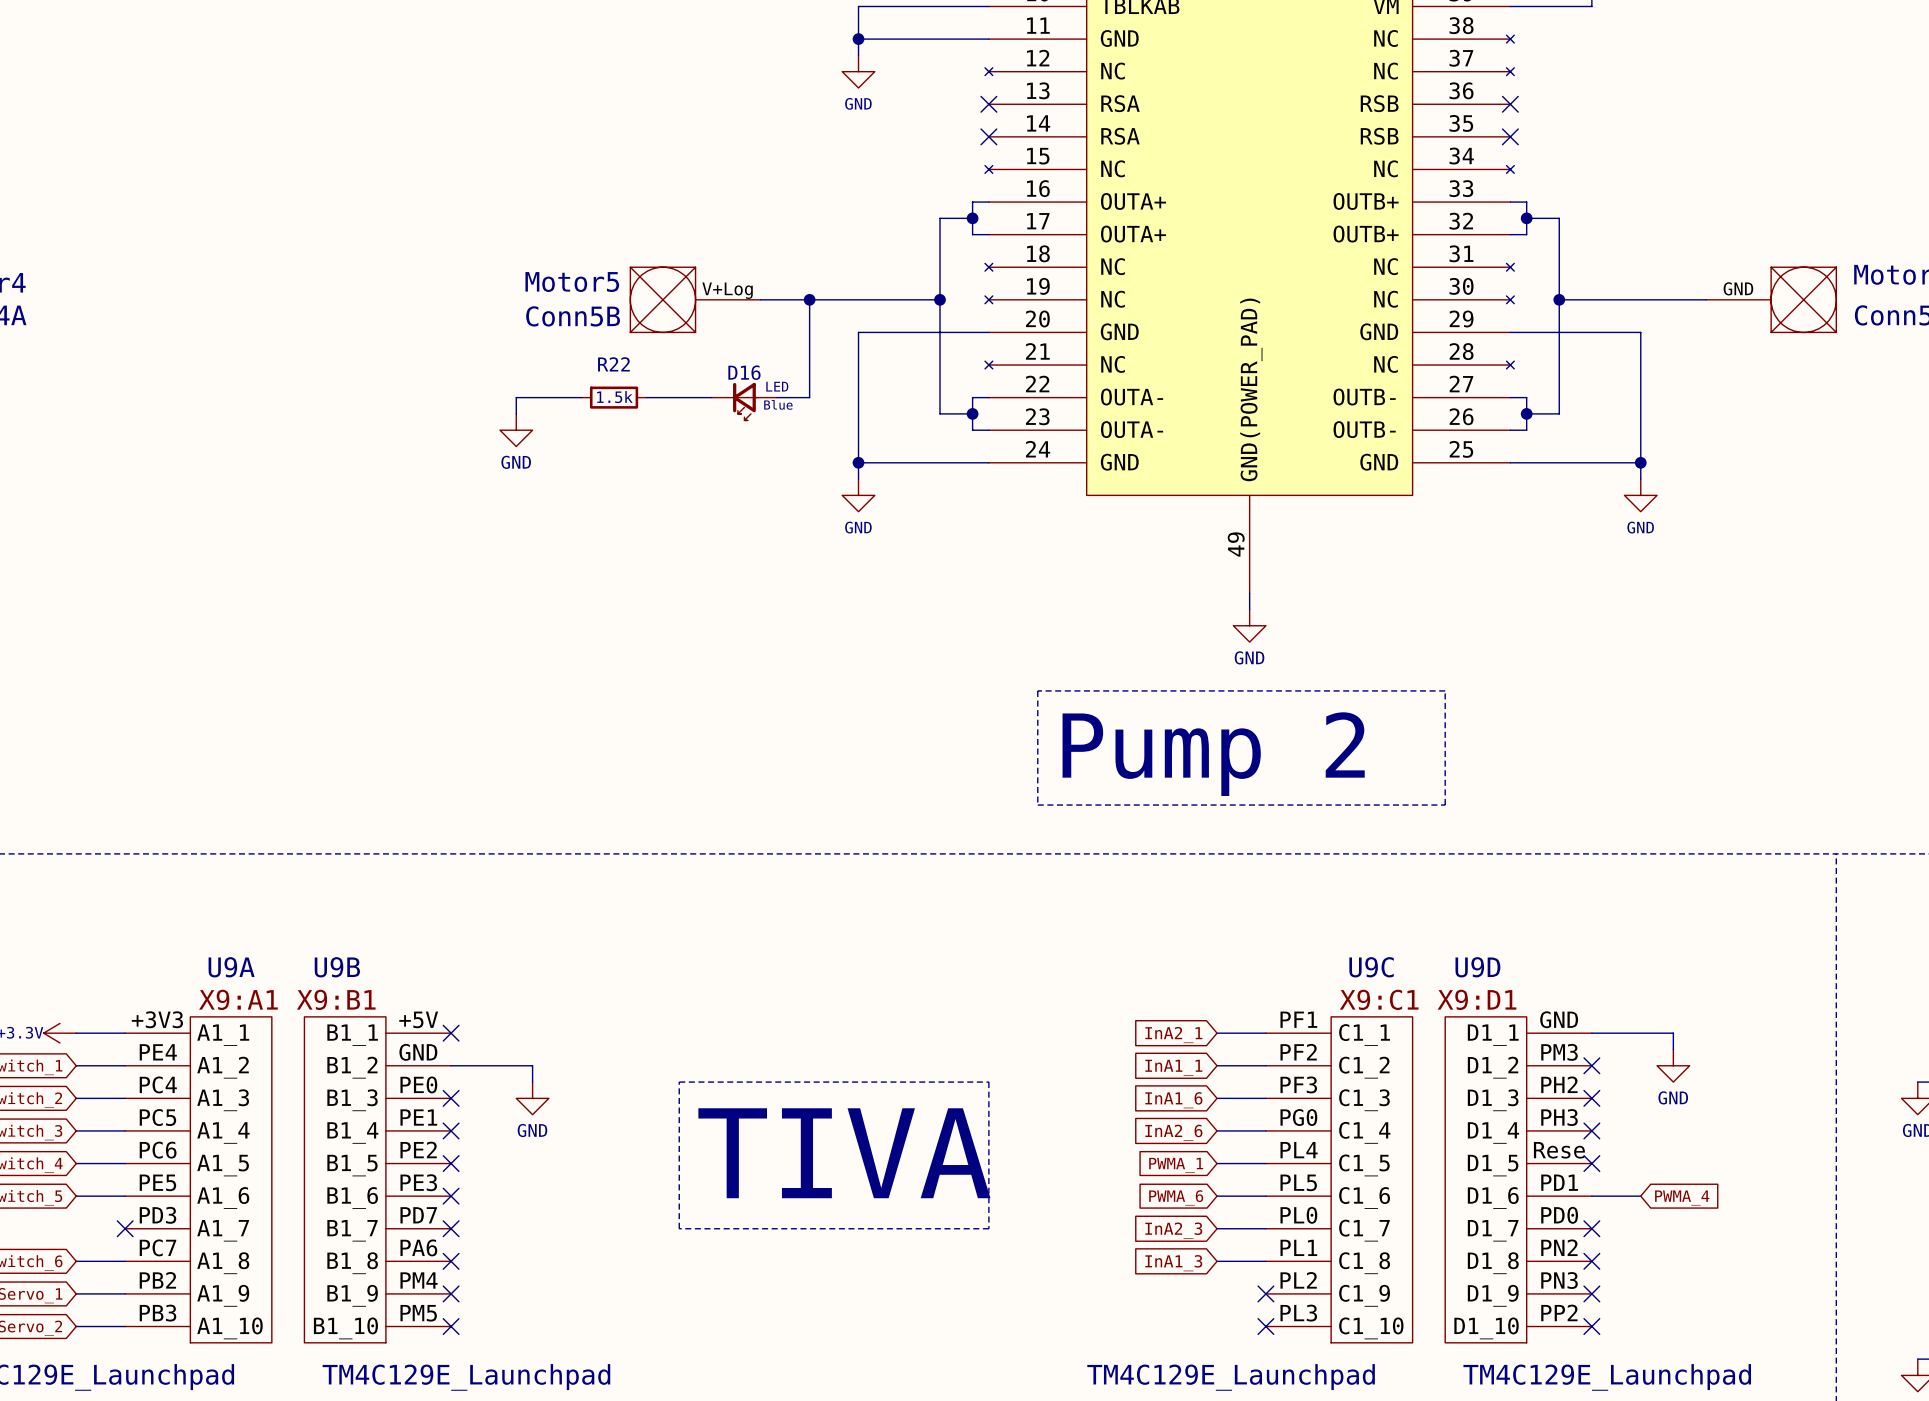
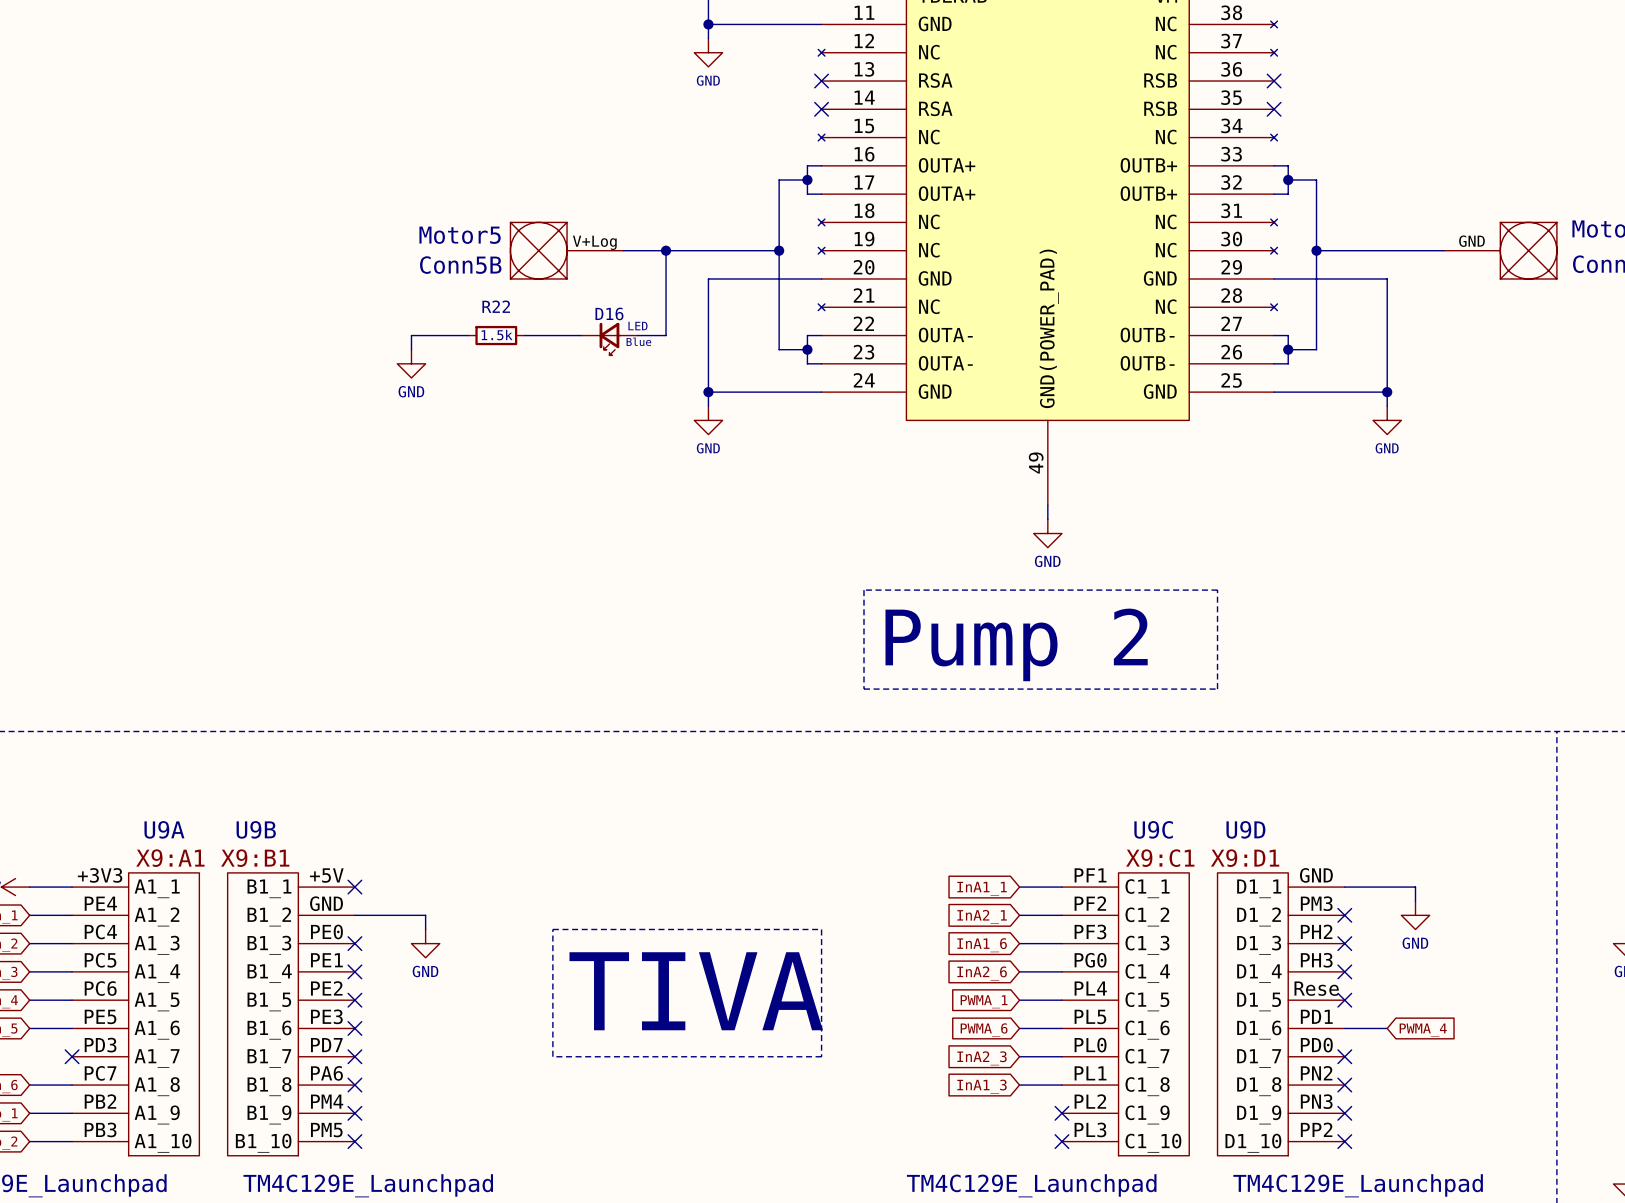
global label: InA2_1 (1173, 1035) -> InA1_1 (982, 888)
global label: InA1_1 (1173, 1067) -> InA2_1 (982, 916)

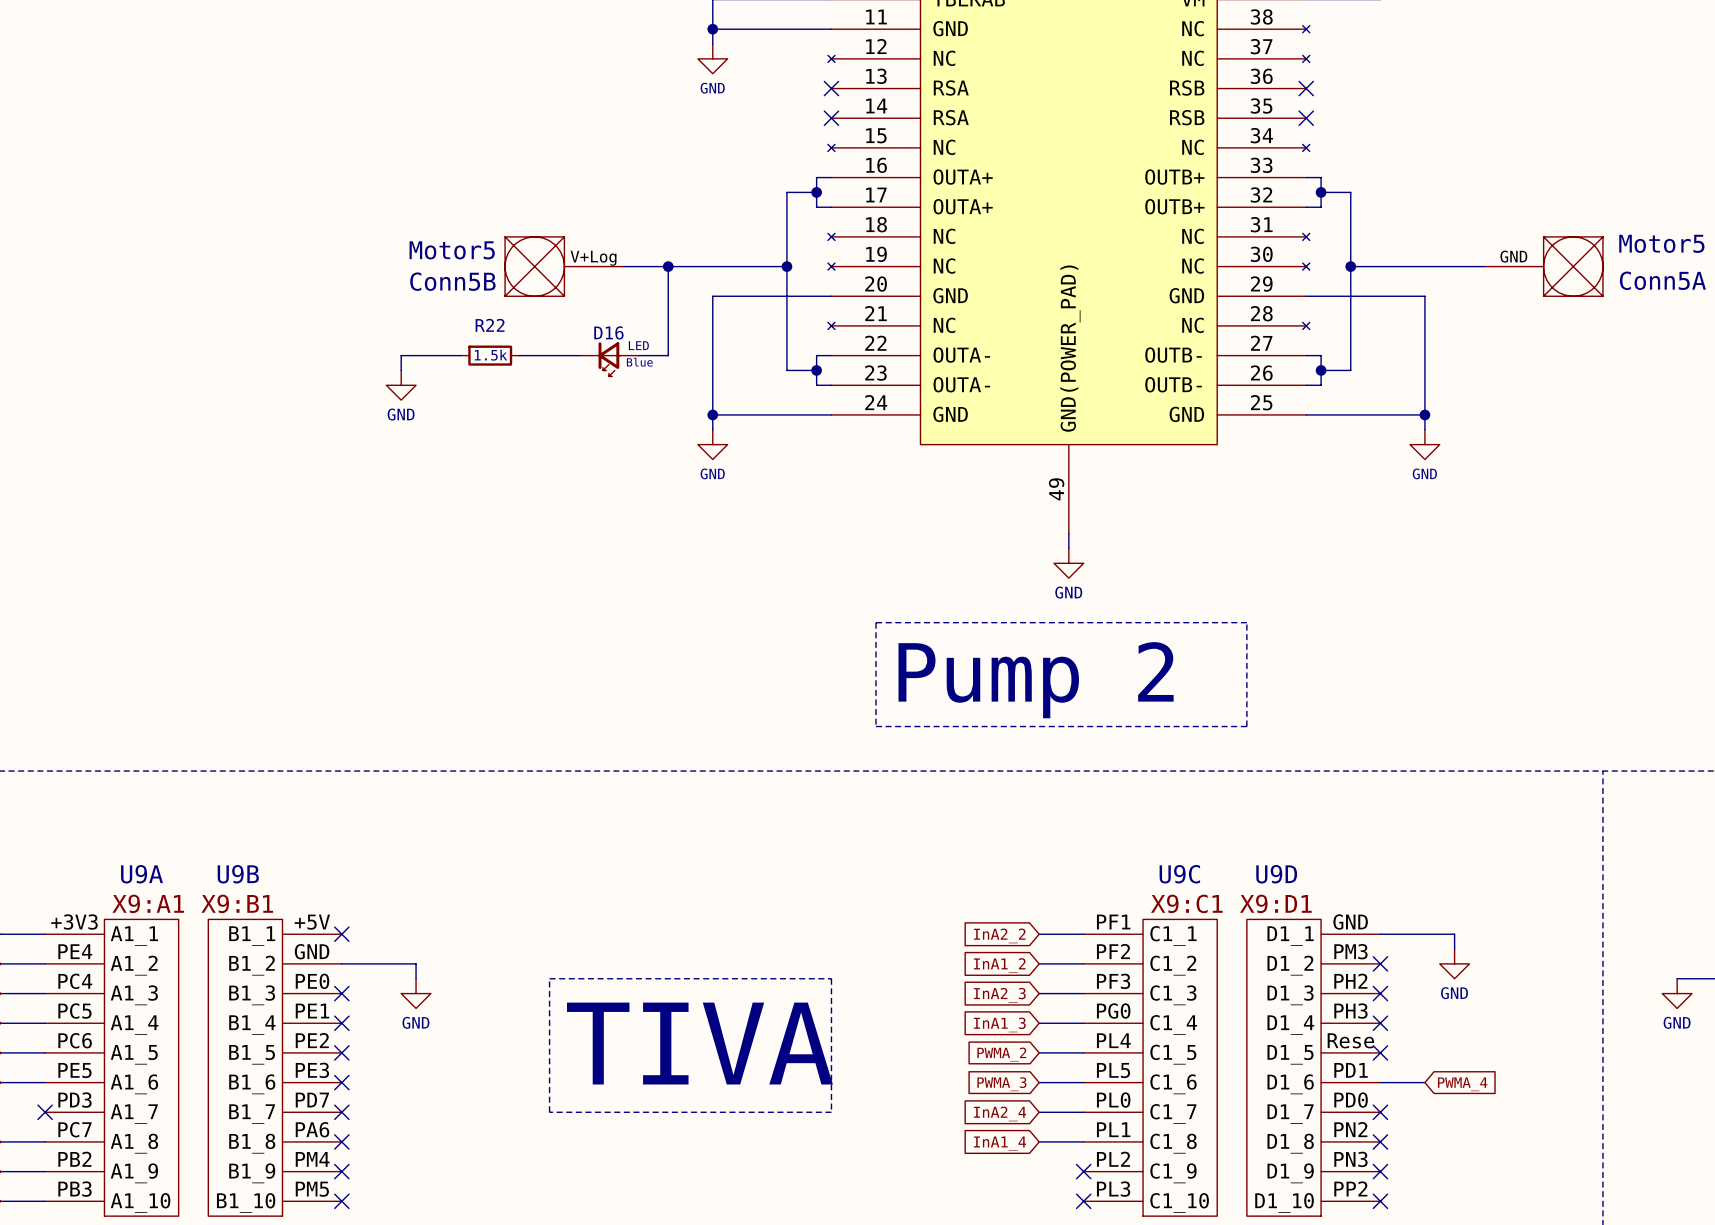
global label: InA1_1 (982, 888) -> InA2_2 (999, 935)
global label: InA2_1 (982, 916) -> InA1_2 (999, 965)
global label: InA1_6 (982, 945) -> InA2_3 (999, 995)
global label: InA2_6 (982, 973) -> InA1_3 (999, 1024)
global label: PWMA_1 (984, 1001) -> PWMA_2 (1001, 1054)
global label: PWMA_6 (984, 1029) -> PWMA_3 (1001, 1084)
global label: InA2_3 (982, 1058) -> InA2_4 (1000, 1113)
global label: InA1_3 (982, 1086) -> InA1_4 (1000, 1143)

